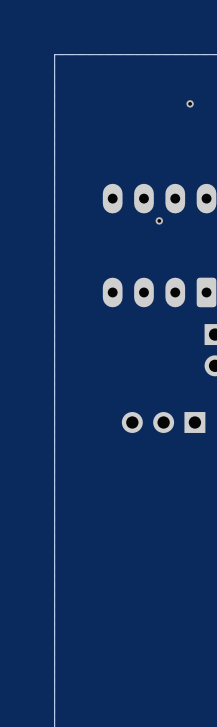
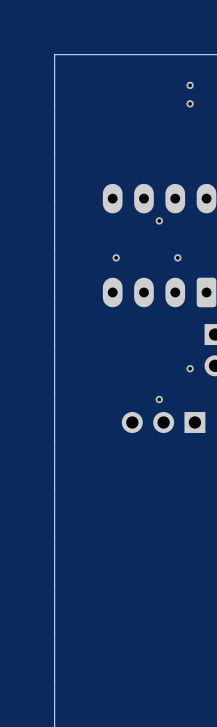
via: none -> (190, 85)
via: none -> (116, 257)
via: none -> (177, 257)
via: none -> (190, 368)
via: none -> (159, 399)

